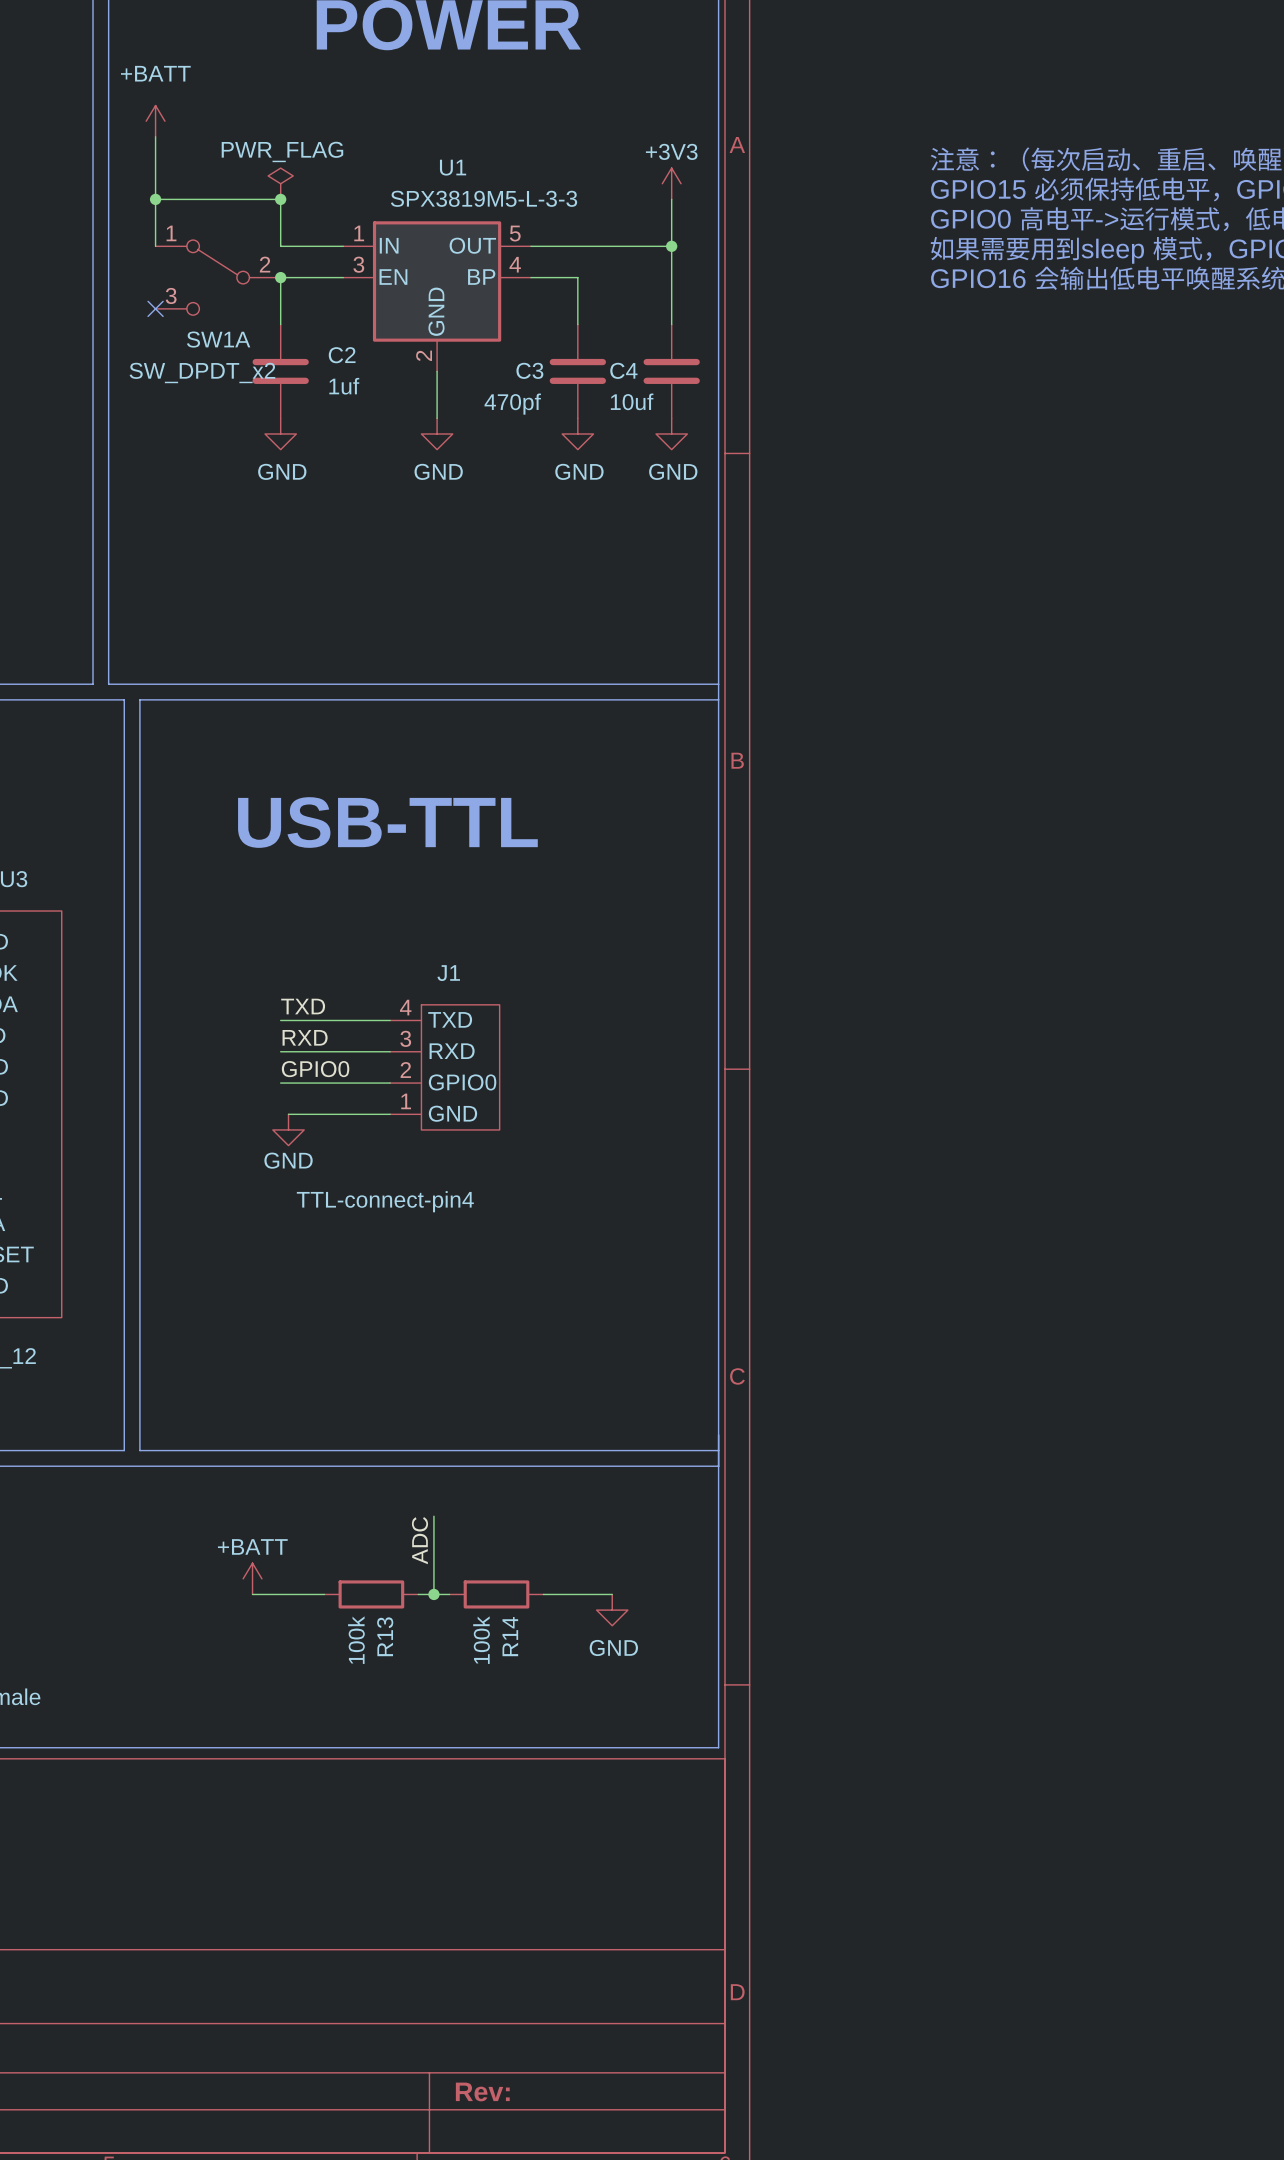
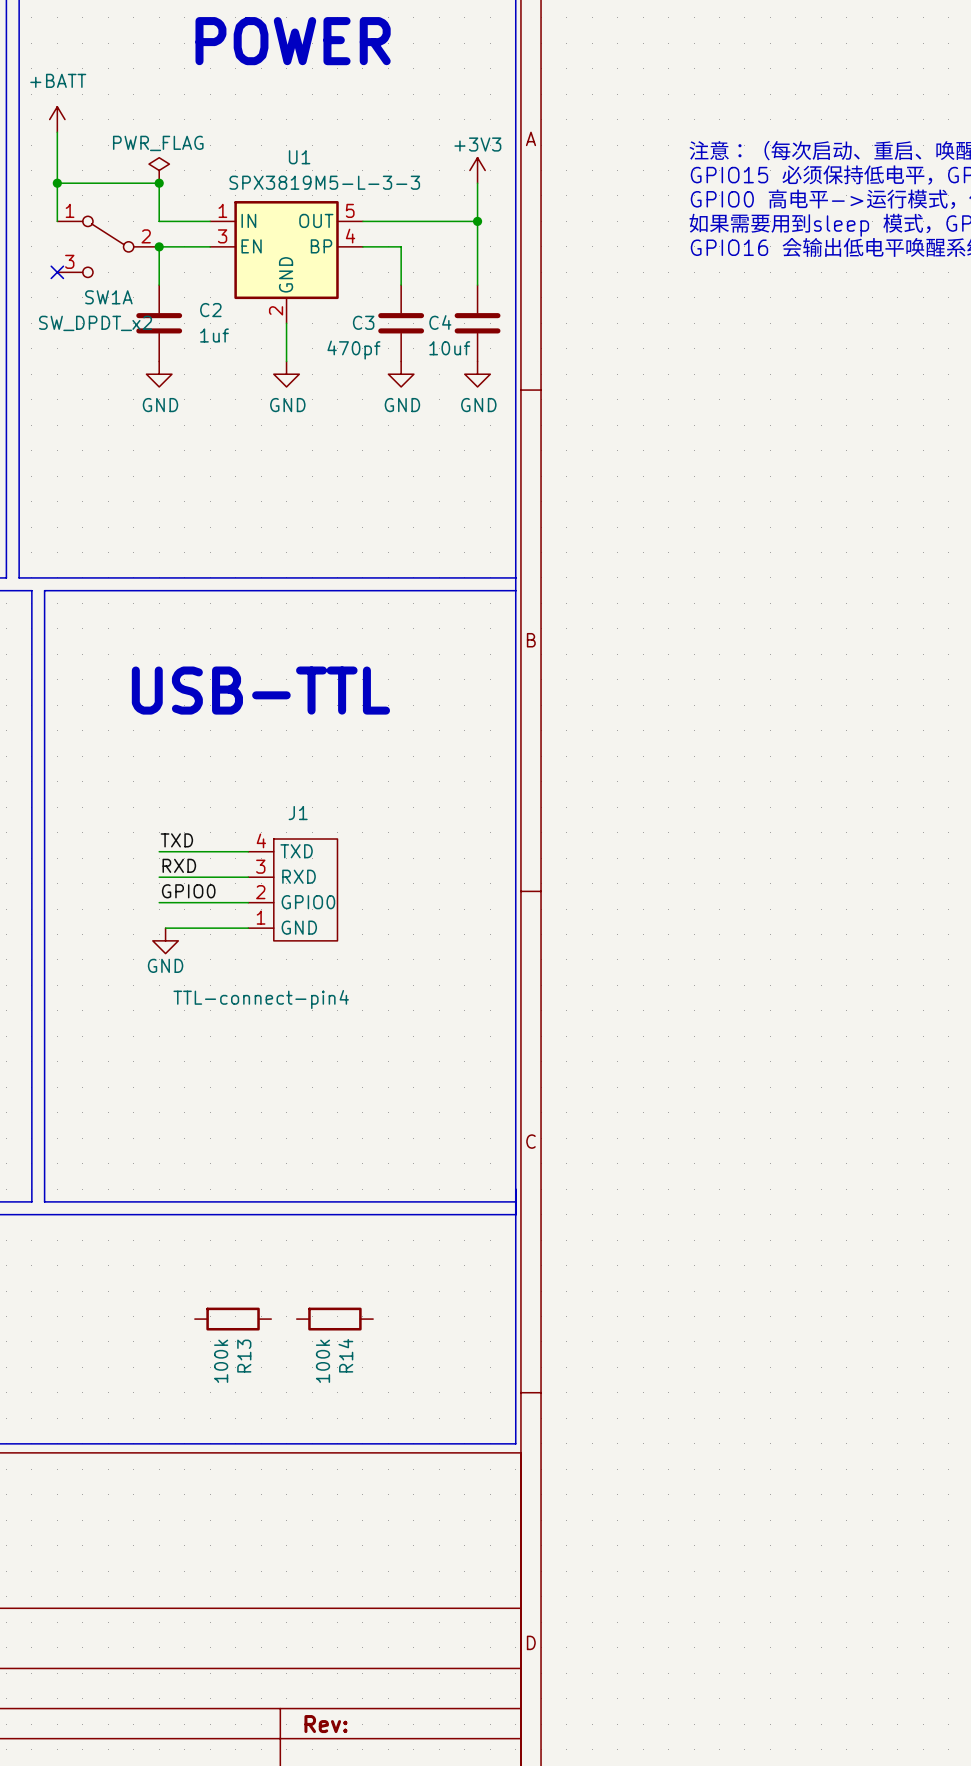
wire: (433, 1516) (433, 1594) -> none
label: ADC (419, 1540) -> none
power symbol: +BATT (252, 1578) -> none
wire: (252, 1594) (324, 1594) -> none
wire: (418, 1594) (449, 1594) -> none
junction: (433, 1594) -> none
wire: (543, 1594) (612, 1594) -> none
power symbol: GND (612, 1610) -> none

